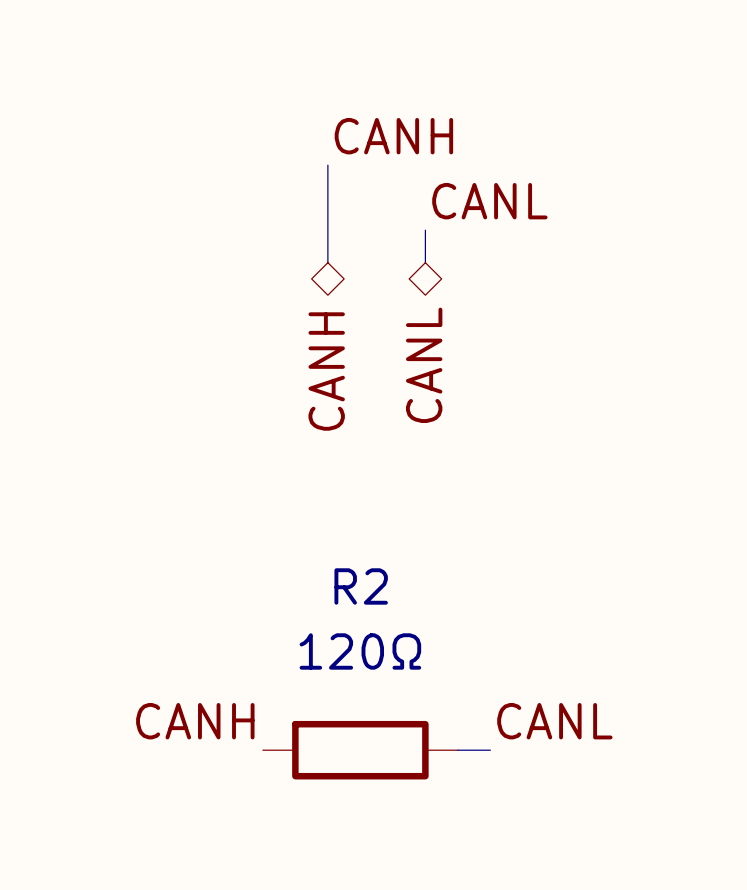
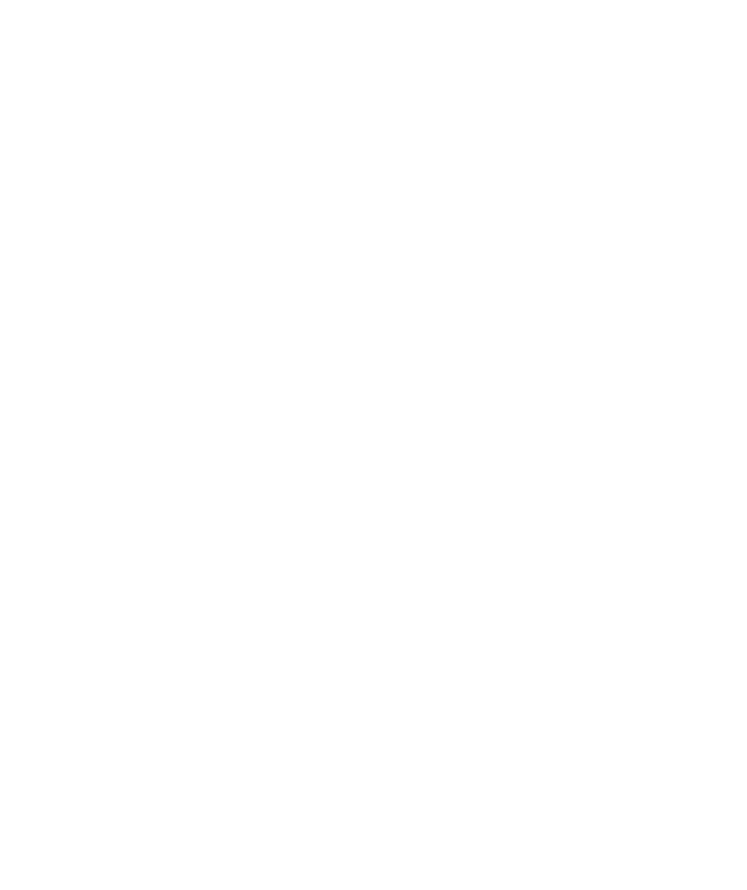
label: CANH (393, 136) -> none
wire: (327, 165) (327, 262) -> none
label: CANL (489, 201) -> none
wire: (425, 230) (425, 262) -> none
hierarchical label: CANL (424, 365) -> none
hierarchical label: CANH (326, 371) -> none
label: CANH (195, 721) -> none
label: CANL (554, 721) -> none
R2: 120Ω (360, 750) -> none
wire: (457, 750) (490, 750) -> none

